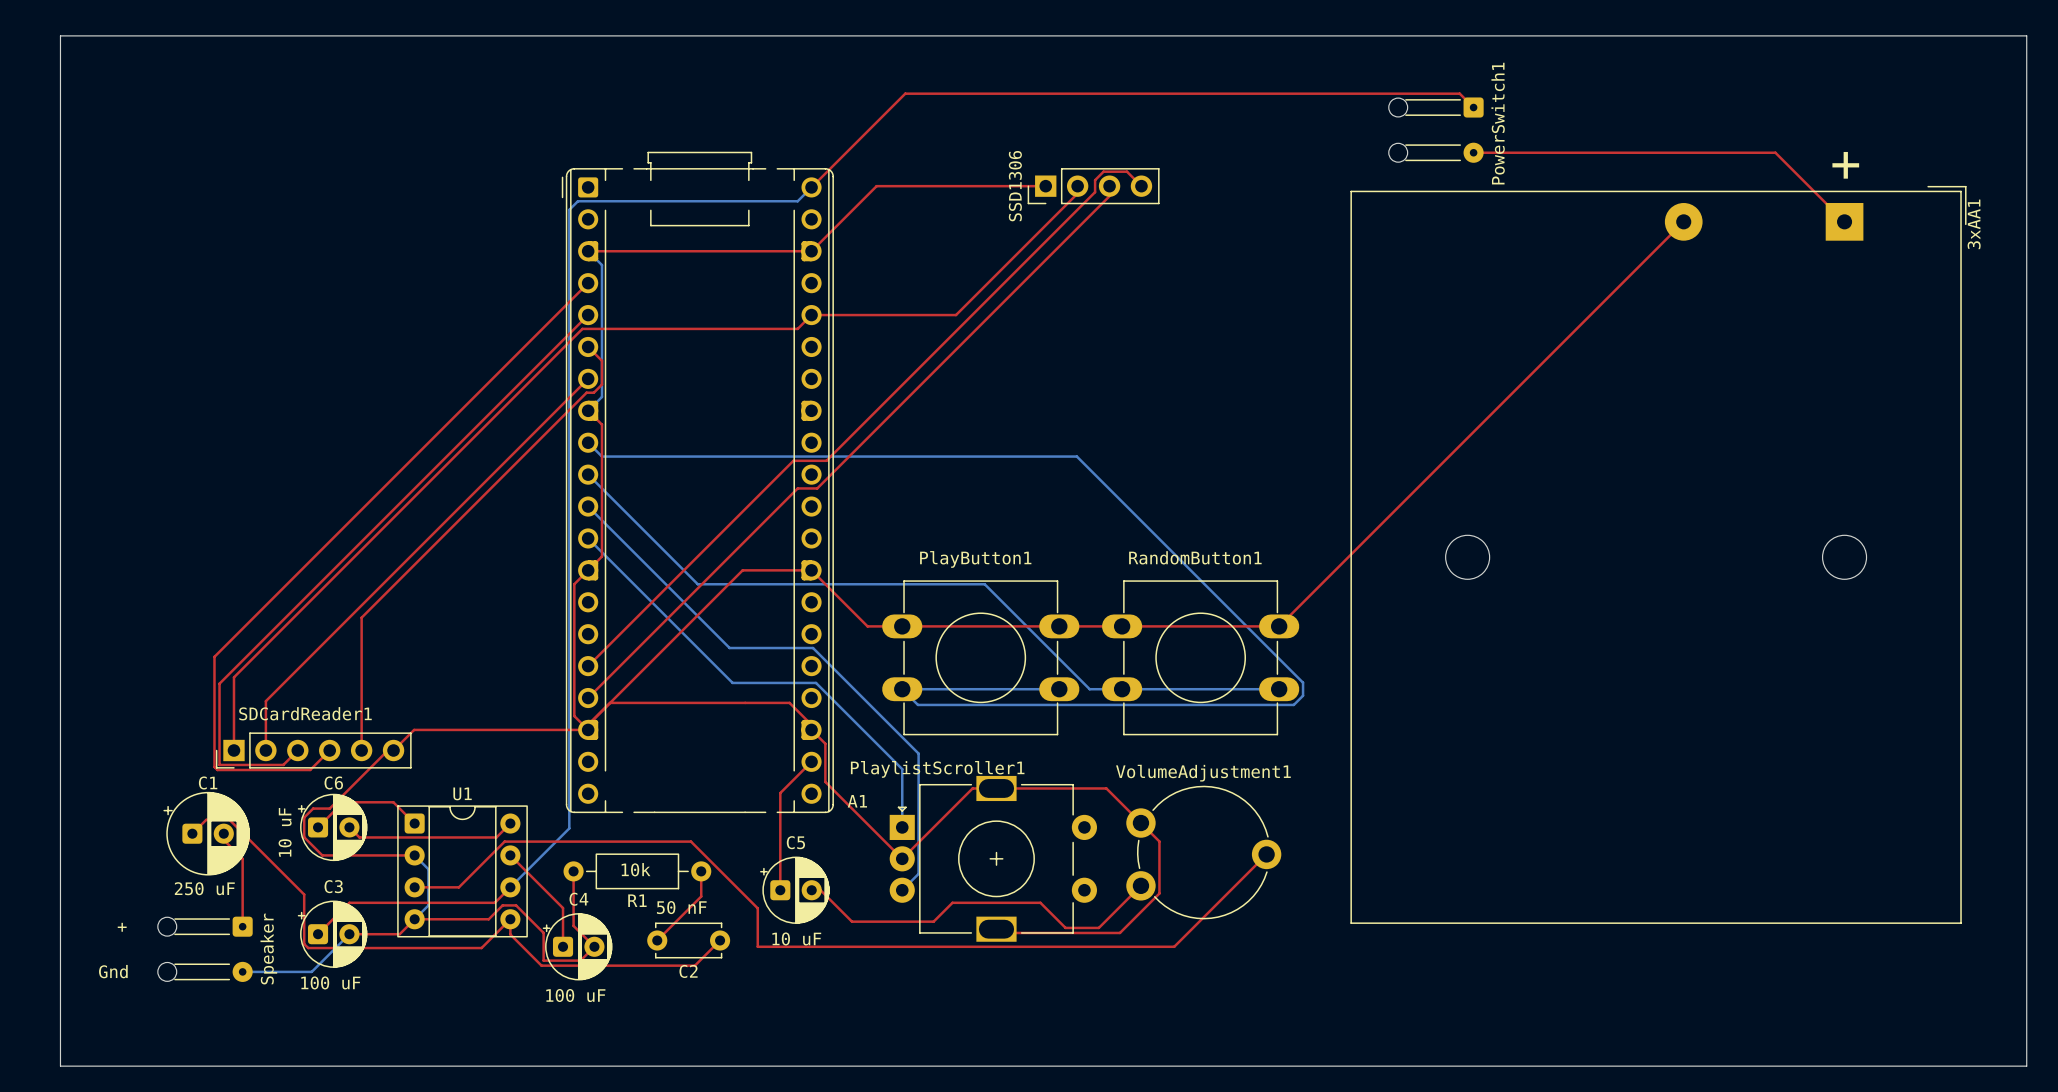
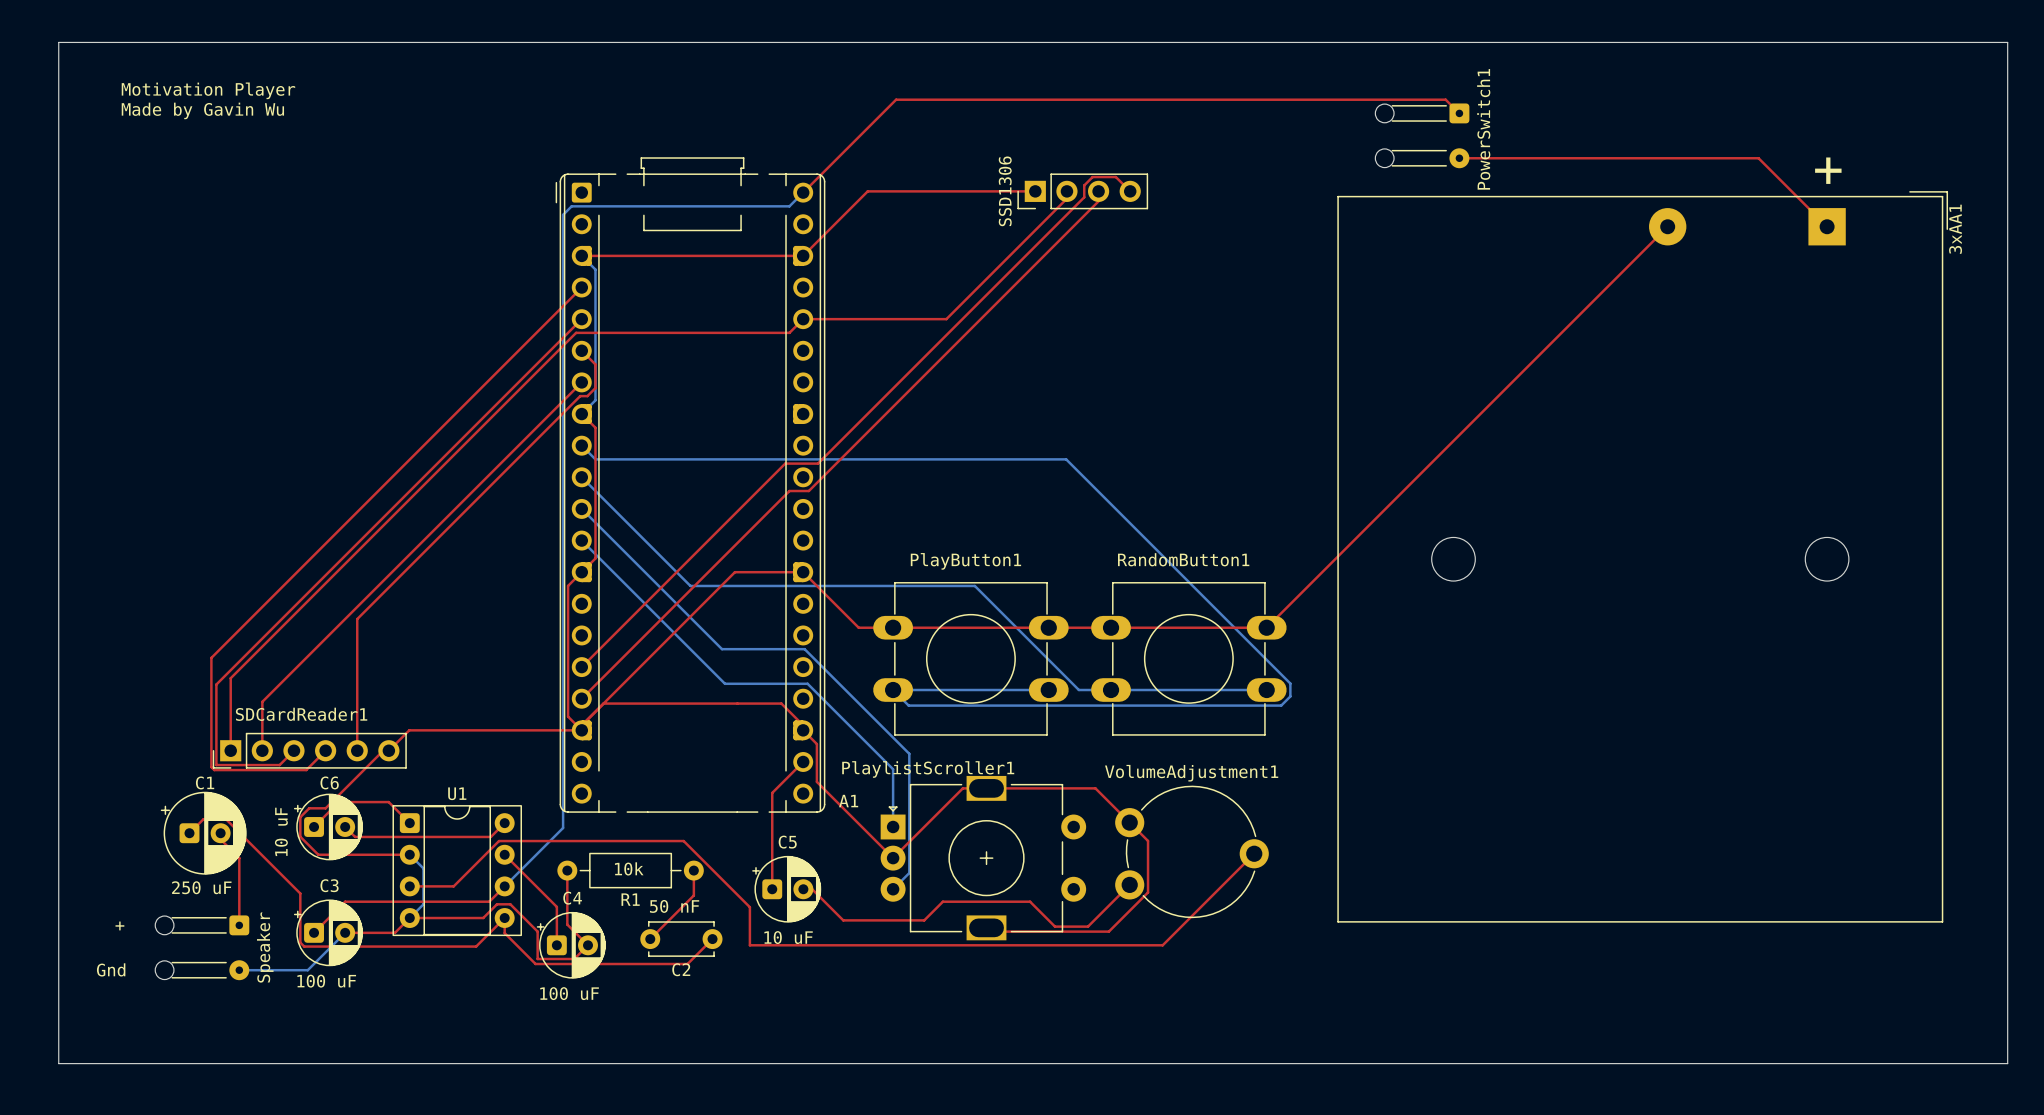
text: none -> Motivation Player (208, 90)
text: none -> Made by Gavin Wu (202, 110)

